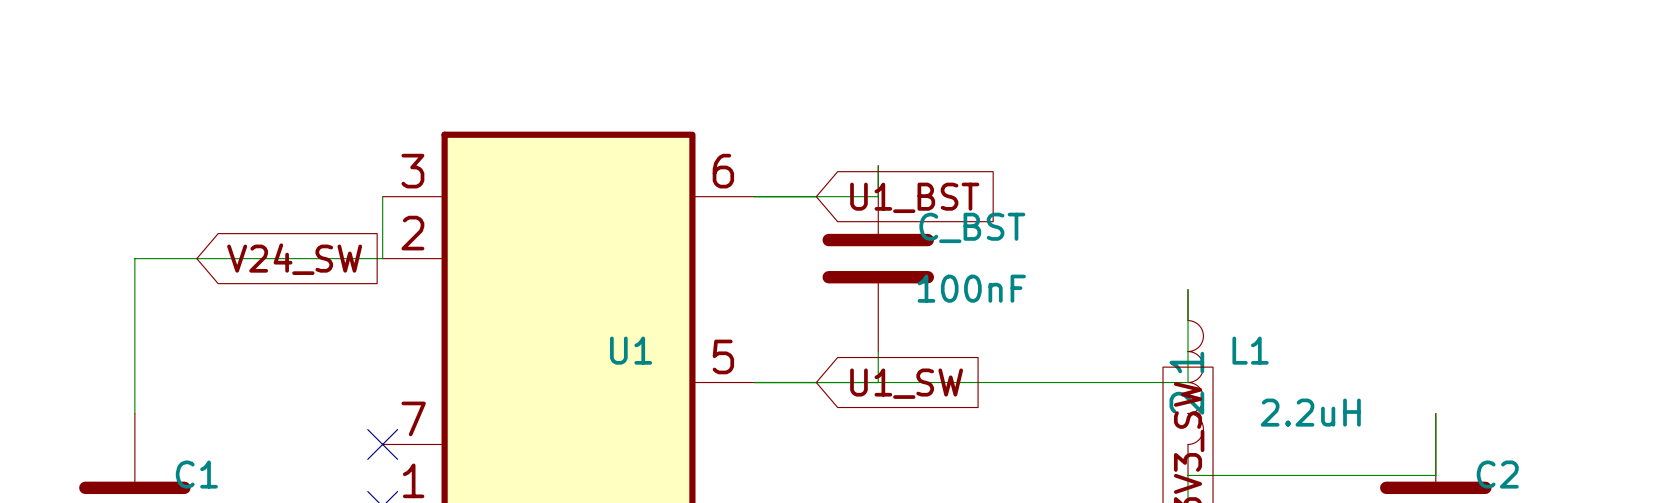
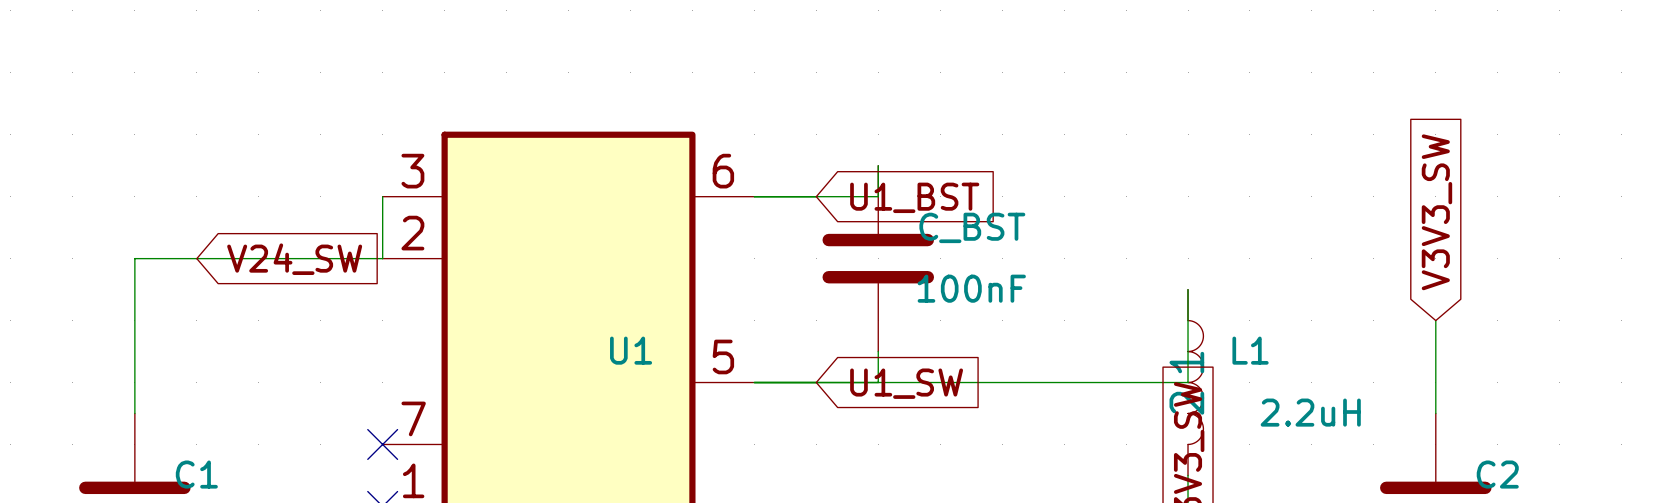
global label: none -> V3V3_SW (1436, 212)
wire: (1435, 413) (1435, 475) (1188, 475) -> (1435, 413) (1435, 320)

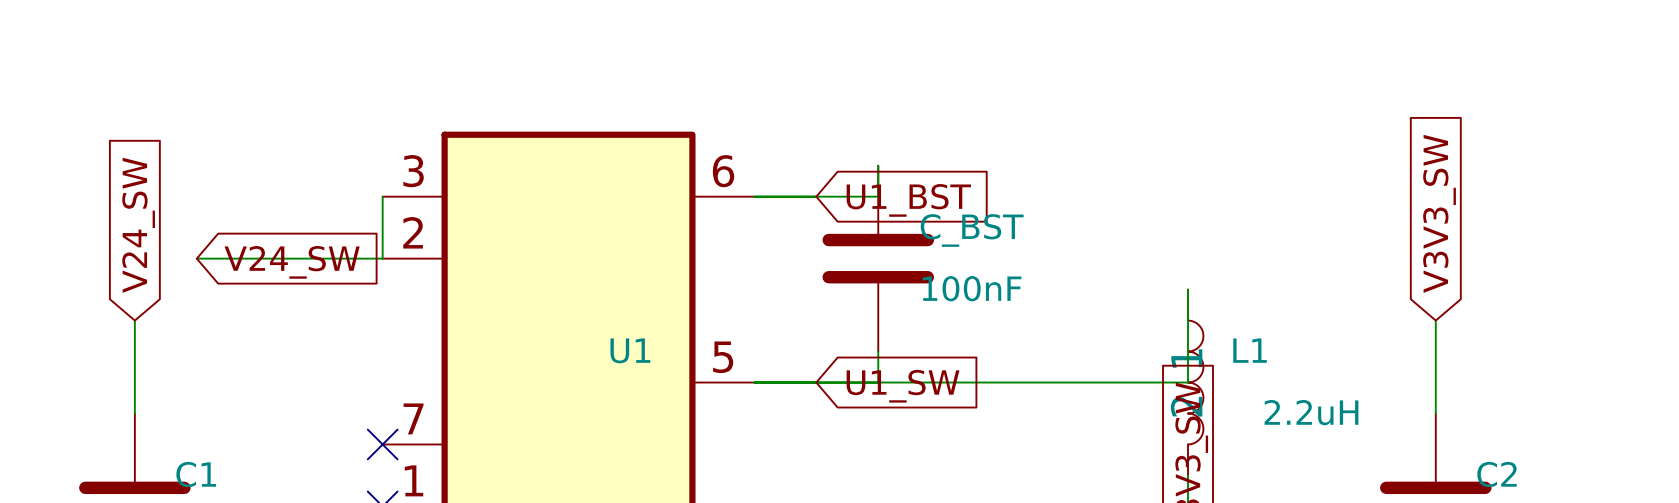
global label: none -> V24_SW (138, 225)
wire: (196, 258) (134, 258) (134, 320) -> none

